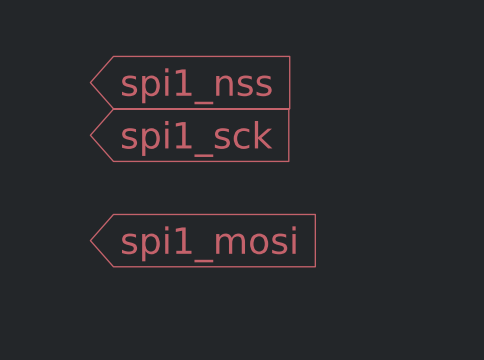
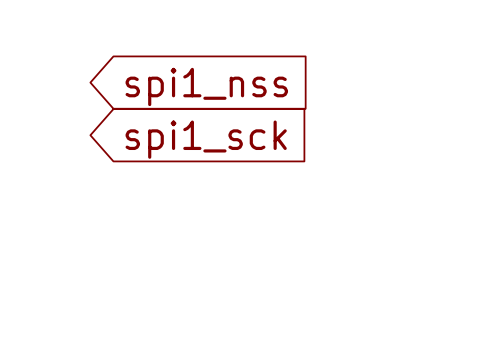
global label: spi1_mosi (208, 244) -> none

